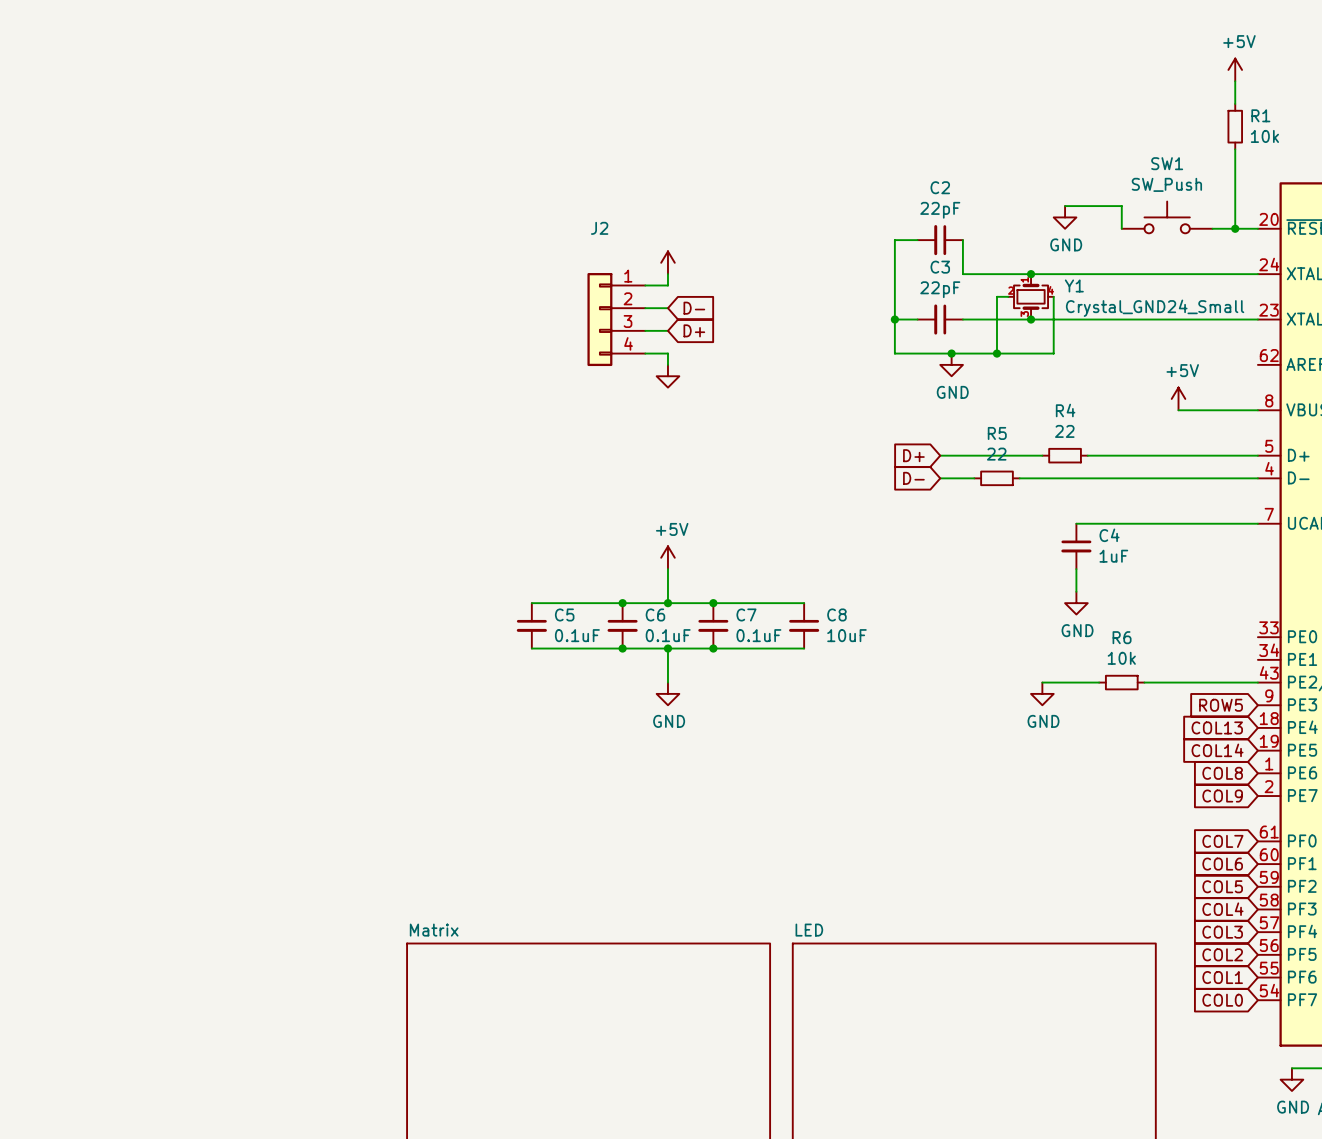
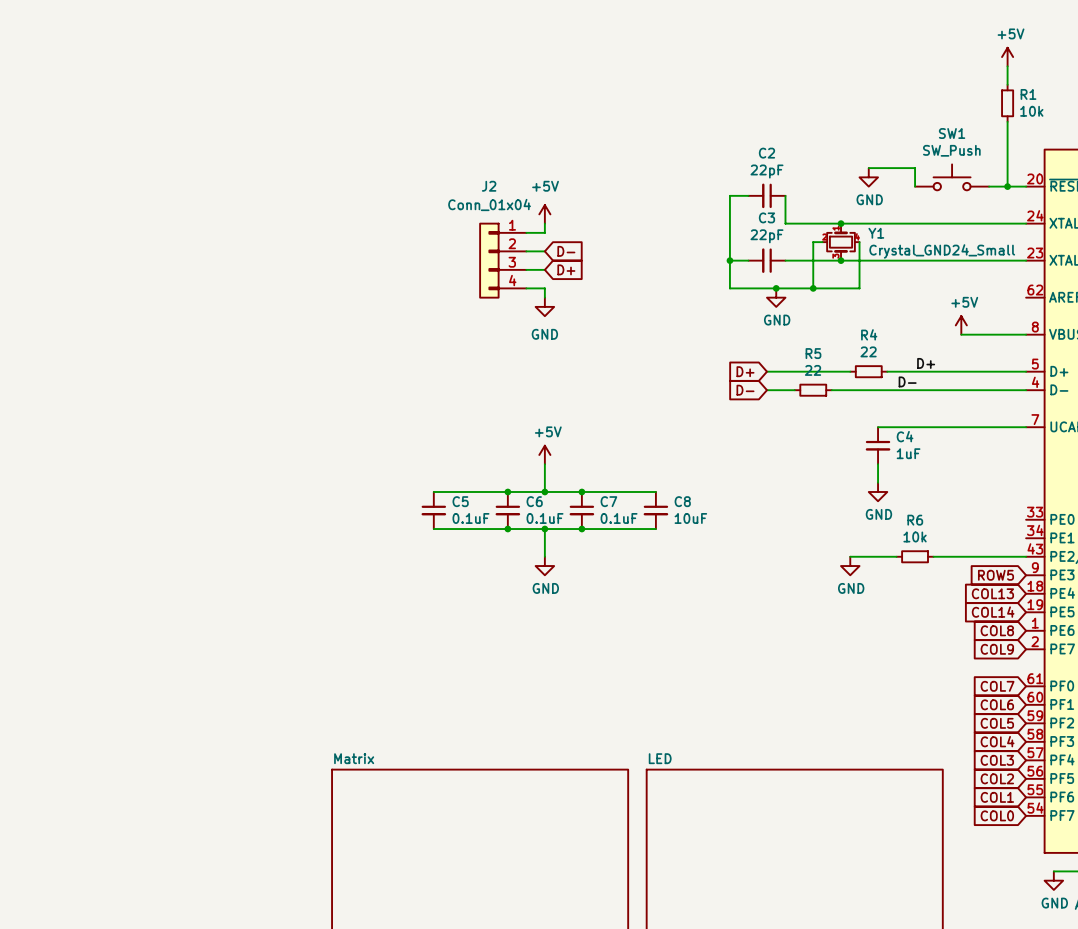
power symbol text: none -> +5V (545, 186)
J2 value: none -> Conn_01x04 (489, 204)
power symbol text: none -> GND (544, 334)
label: none -> D+ (926, 363)
label: none -> D- (907, 381)

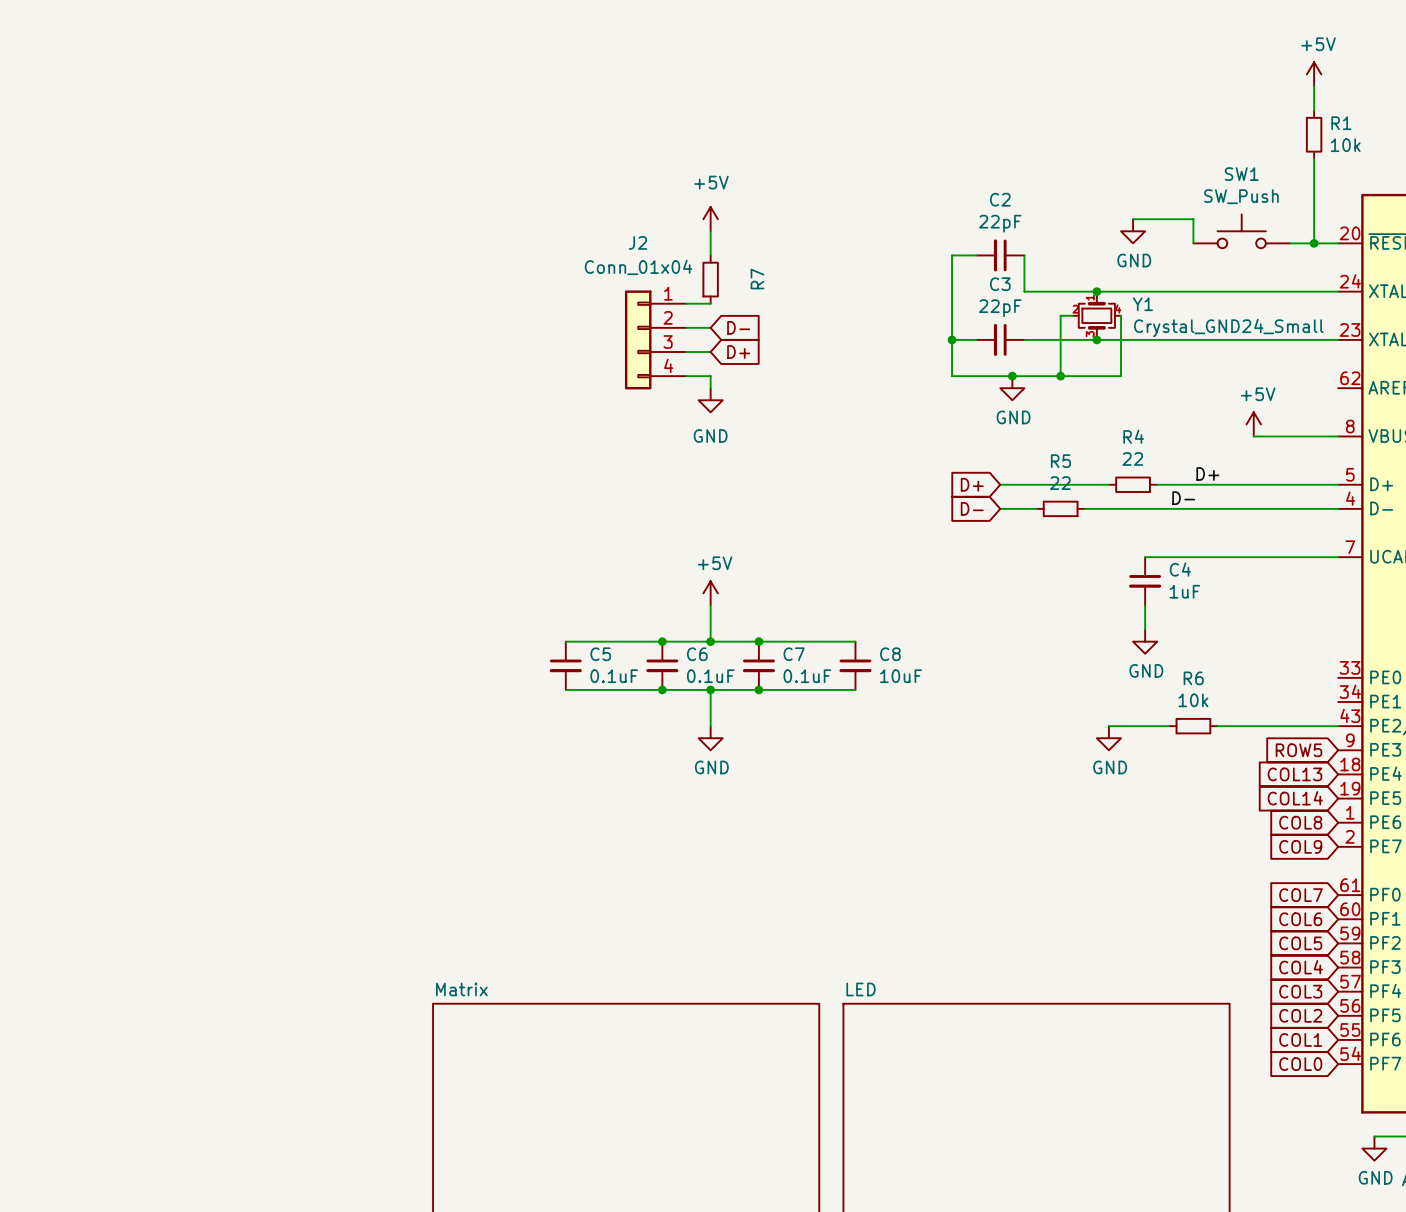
wire: none -> (710, 231) (710, 255)
power symbol position: +5V (544, 214) -> +5V (710, 219)
R7: none -> (710, 279)

